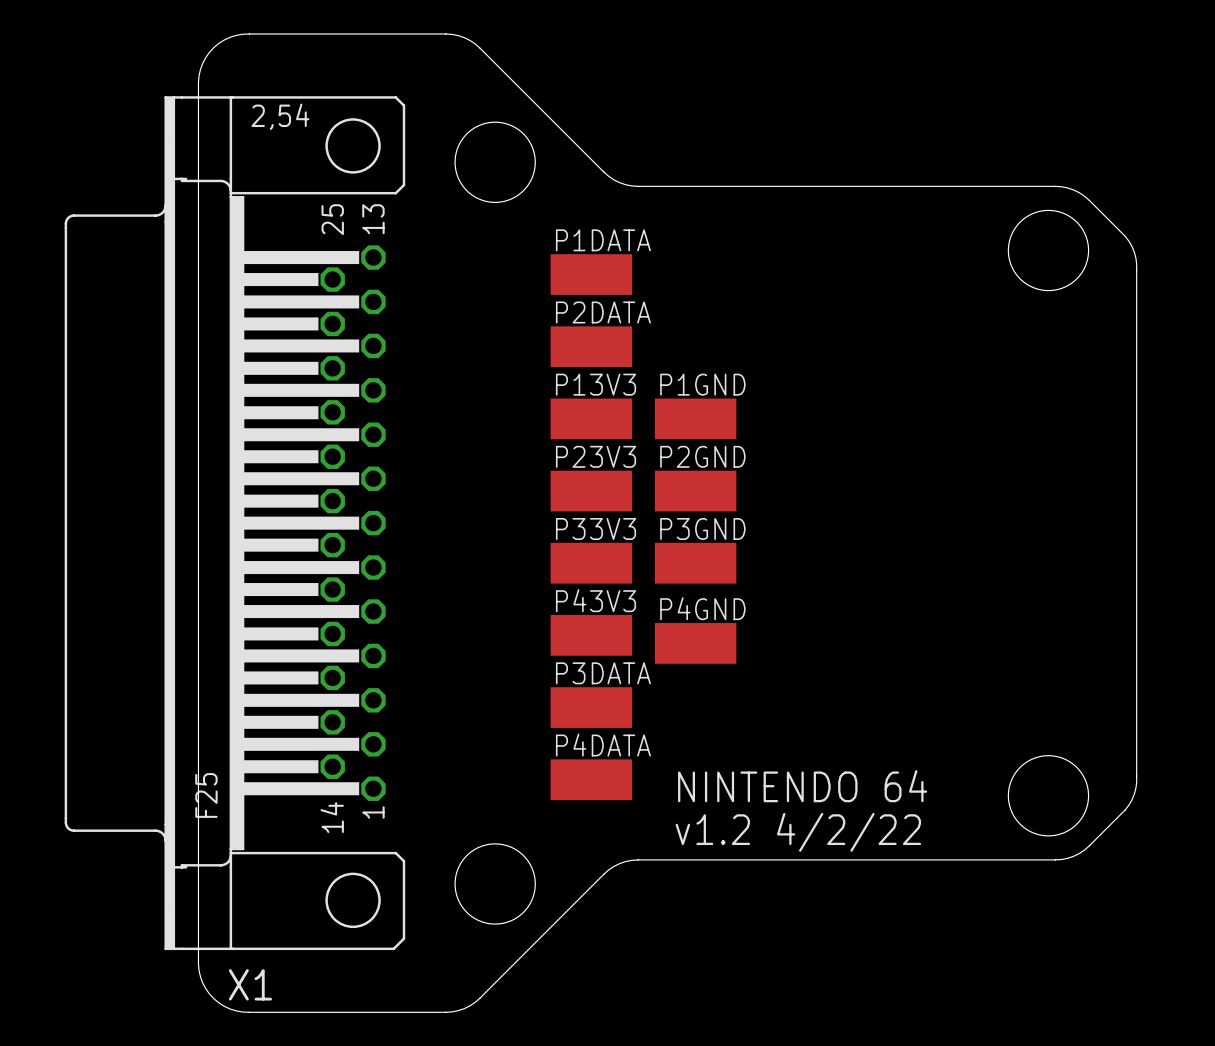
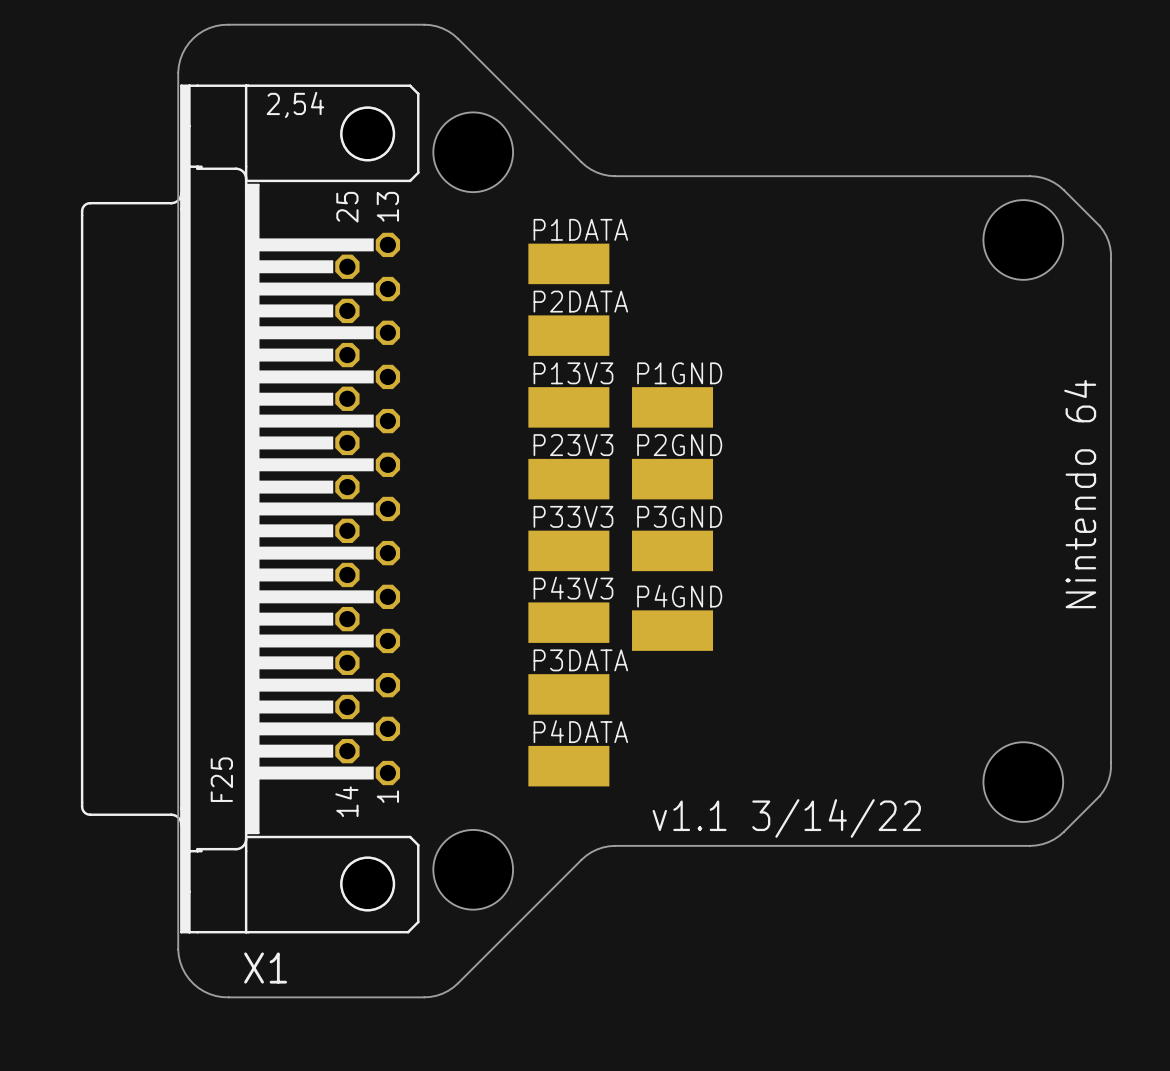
text: none -> Nintendo 64 (1080, 494)
X1 position: (234, 523) -> (250, 508)
text: NINTENDO 64 (802, 786) -> none
text: v1.2 4/2/22 (798, 832) -> v1.1 3/14/22 (786, 818)

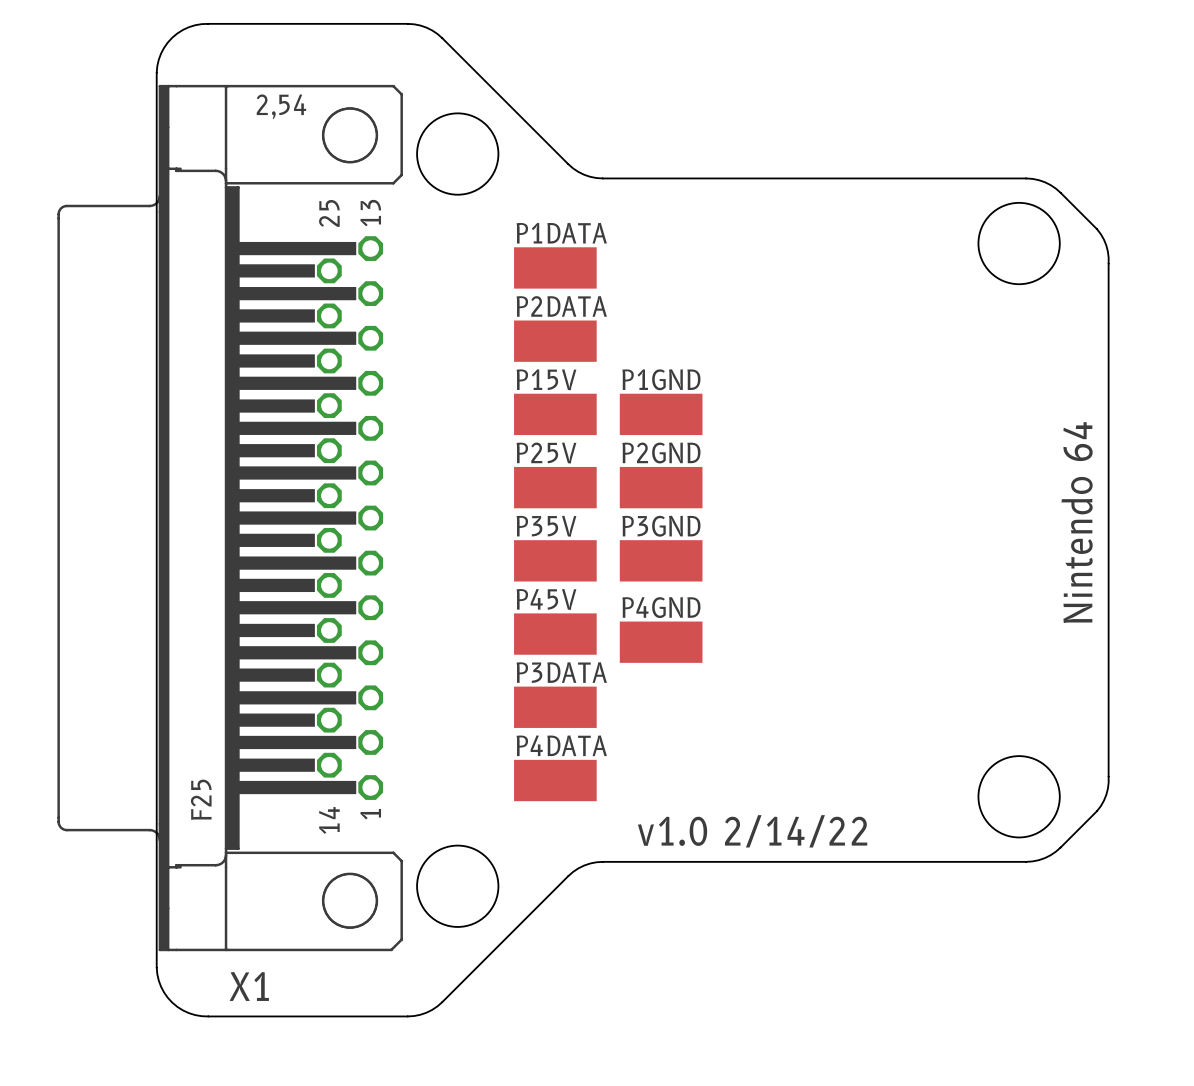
P13V3 name: P13V3 (573, 373) -> P15V (546, 379)
P23V3 name: P23V3 (573, 445) -> P25V (546, 453)
P33V3 name: P33V3 (573, 516) -> P35V (546, 526)
P43V3 name: P43V3 (573, 588) -> P45V (546, 599)
text: v1.1 3/14/22 (786, 818) -> v1.0 2/14/22 (752, 831)

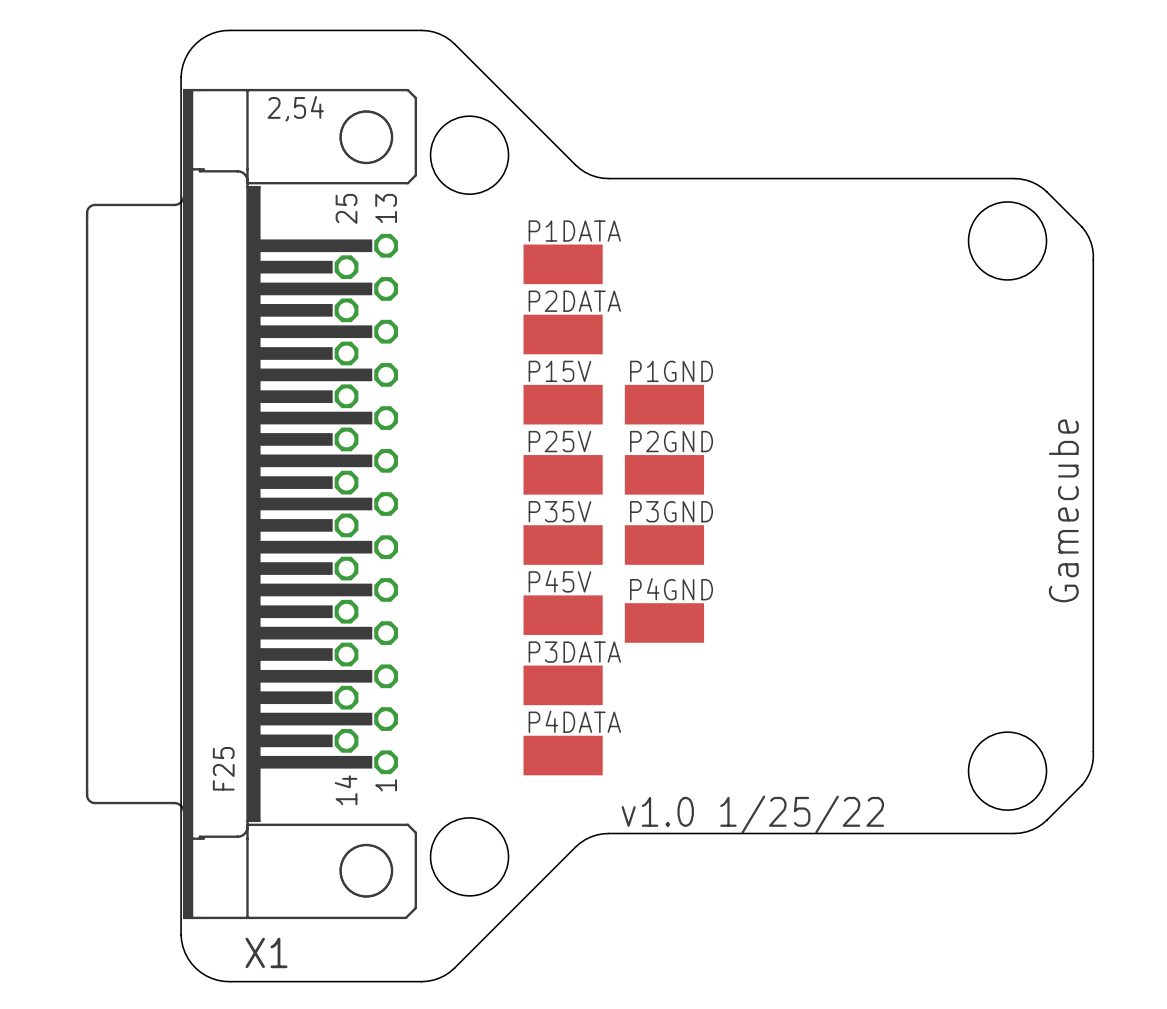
text: Nintendo 64 (1077, 522) -> Gamecube (1063, 510)
text: v1.0 2/14/22 (752, 831) -> v1.0 1/25/22 (752, 814)

